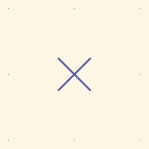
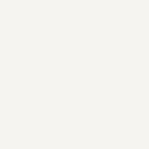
no-connect mark: (74, 74) -> none

